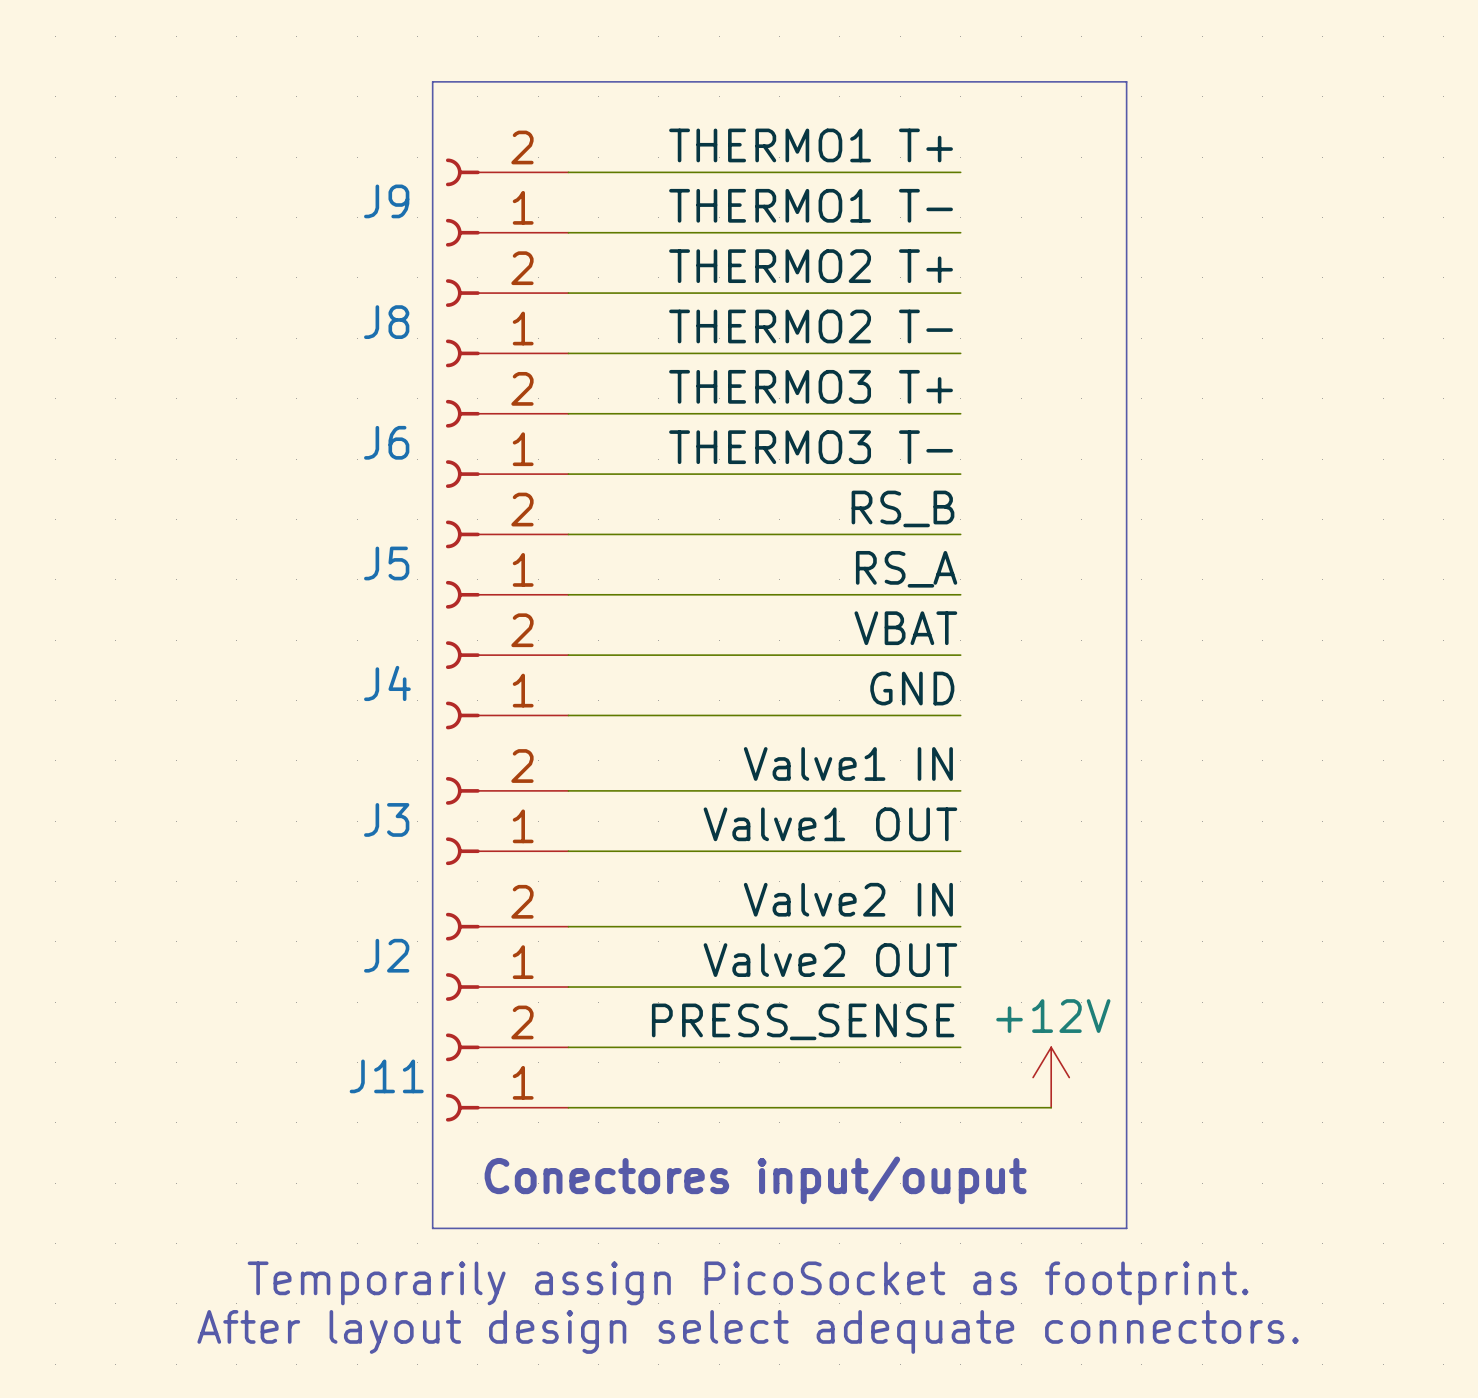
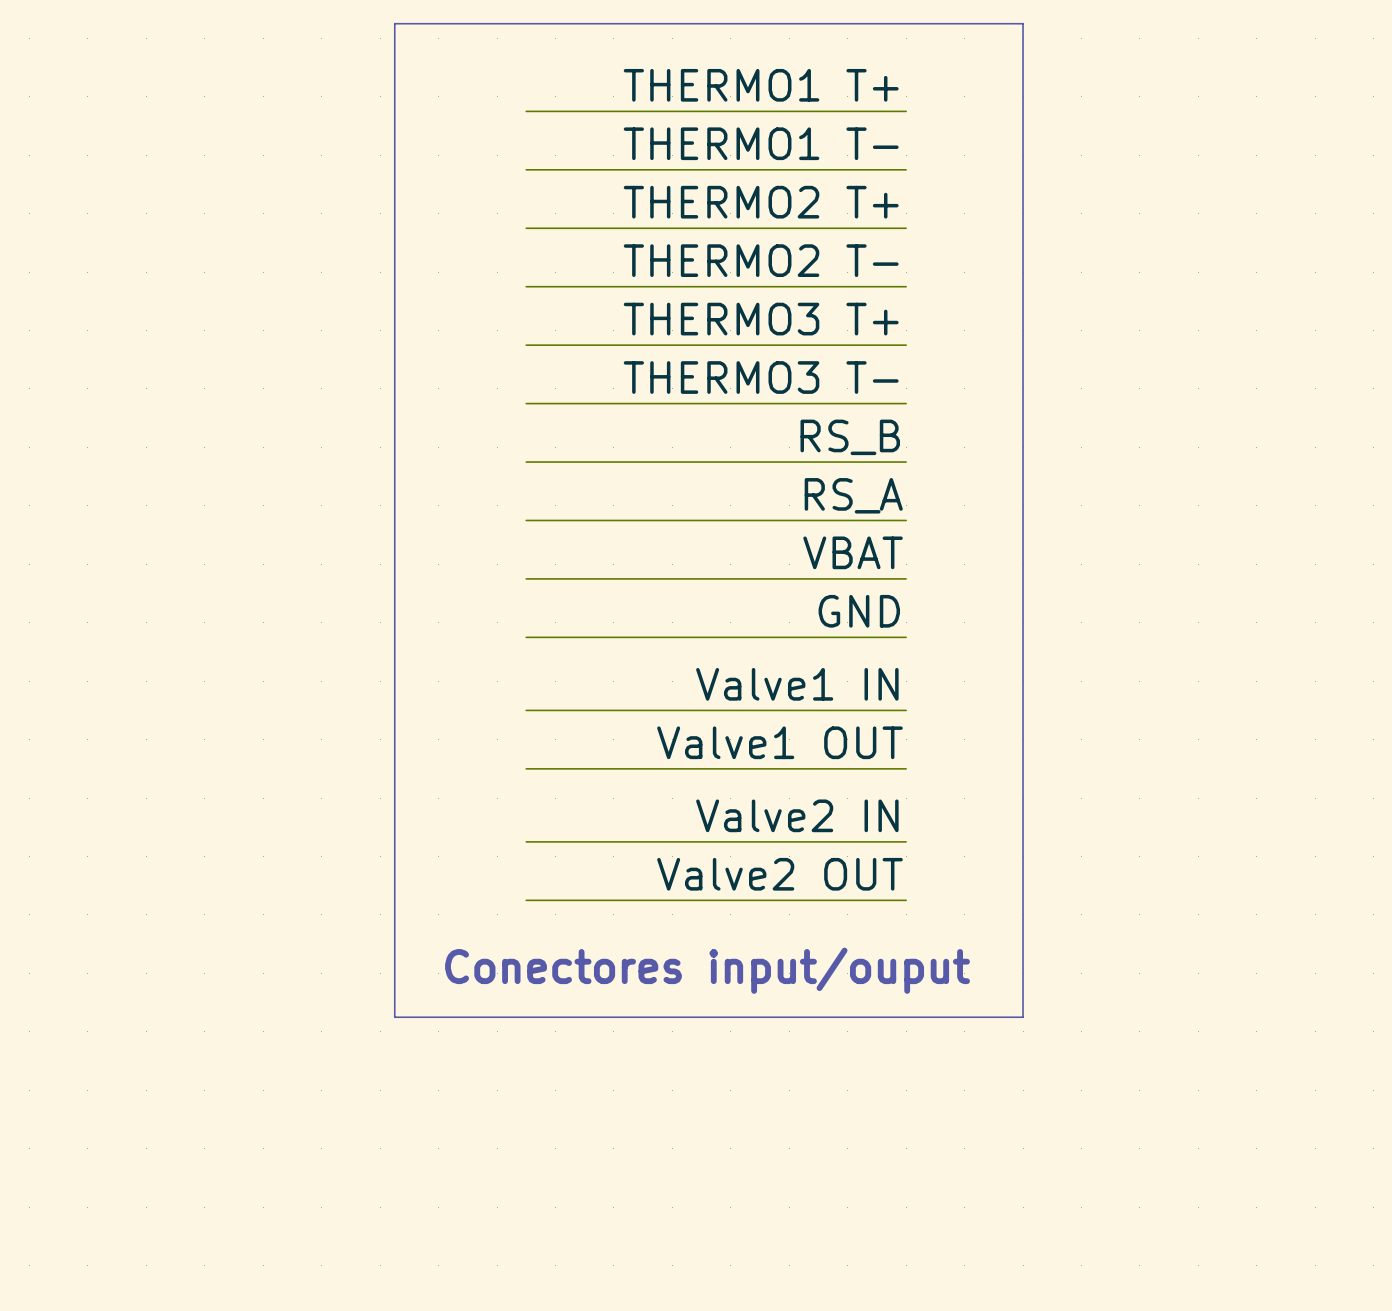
line: (1081, 81) (1126, 81) (1126, 1228) (432, 1228) (432, 1107) -> (1023, 23) (1023, 1017) (394, 1017)
J9: (507, 202) -> none
J8: (507, 323) -> none
J6: (507, 443) -> none
J5: (507, 564) -> none
J4: (507, 685) -> none
J3: (507, 821) -> none
J2: (507, 956) -> none
label: PRESS_SENSE (803, 1021) -> none
wire: (568, 1047) (960, 1047) -> none
J11: (507, 1077) -> none
power symbol: +12V (1051, 1077) -> none
text position: Conectores input/ouput (755, 1180) -> Conectores input/ouput (707, 970)
text: Temporarily assign PicoSocket as footprint. (748, 1283) -> none
text: After layout design select adequate connectors. (748, 1331) -> none

